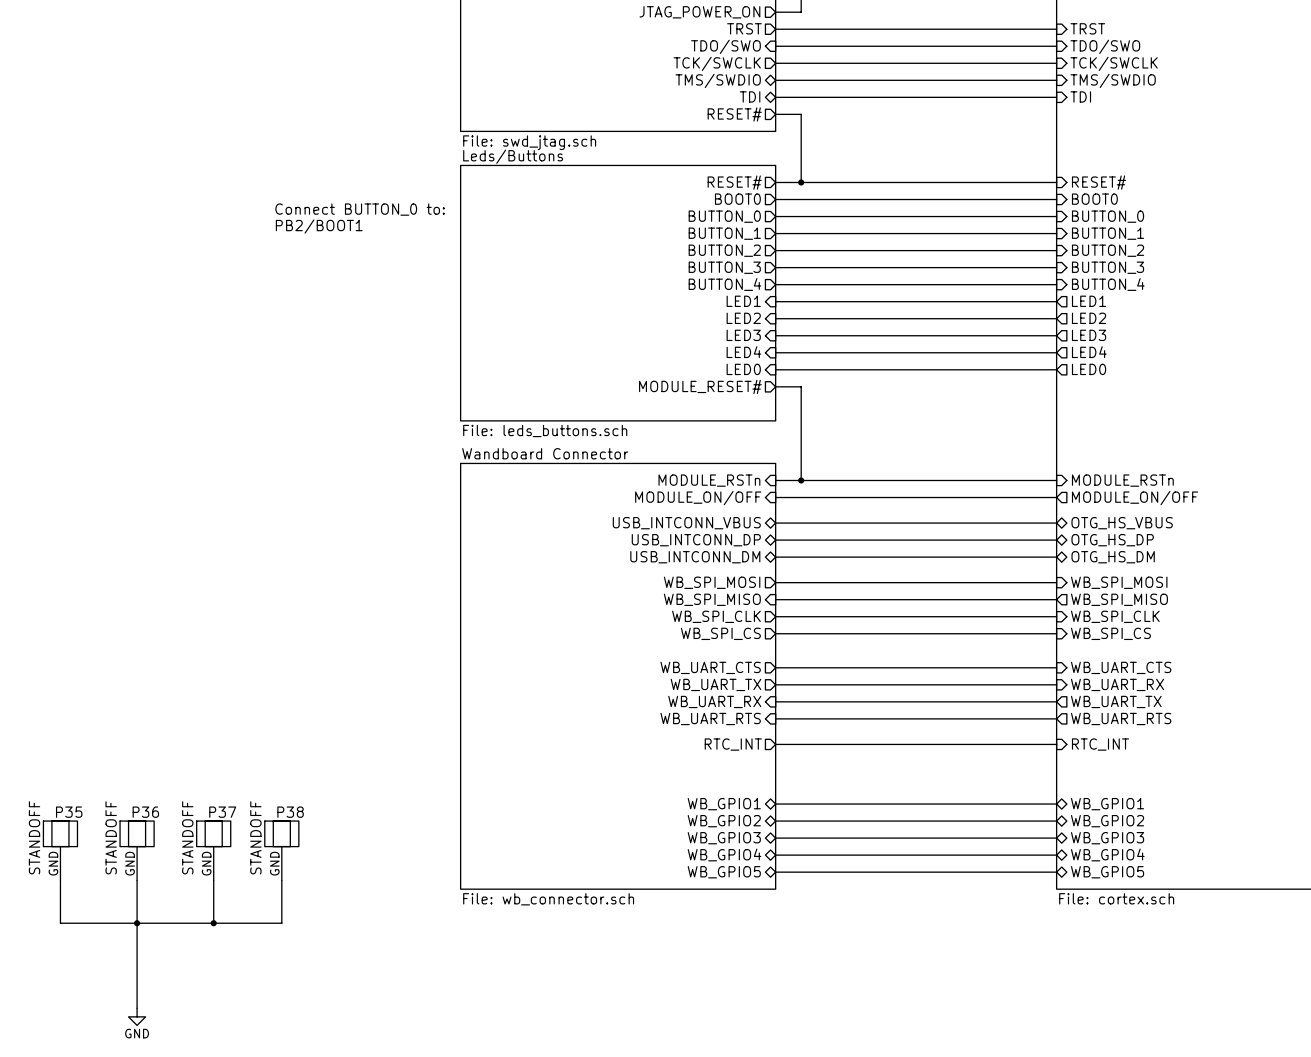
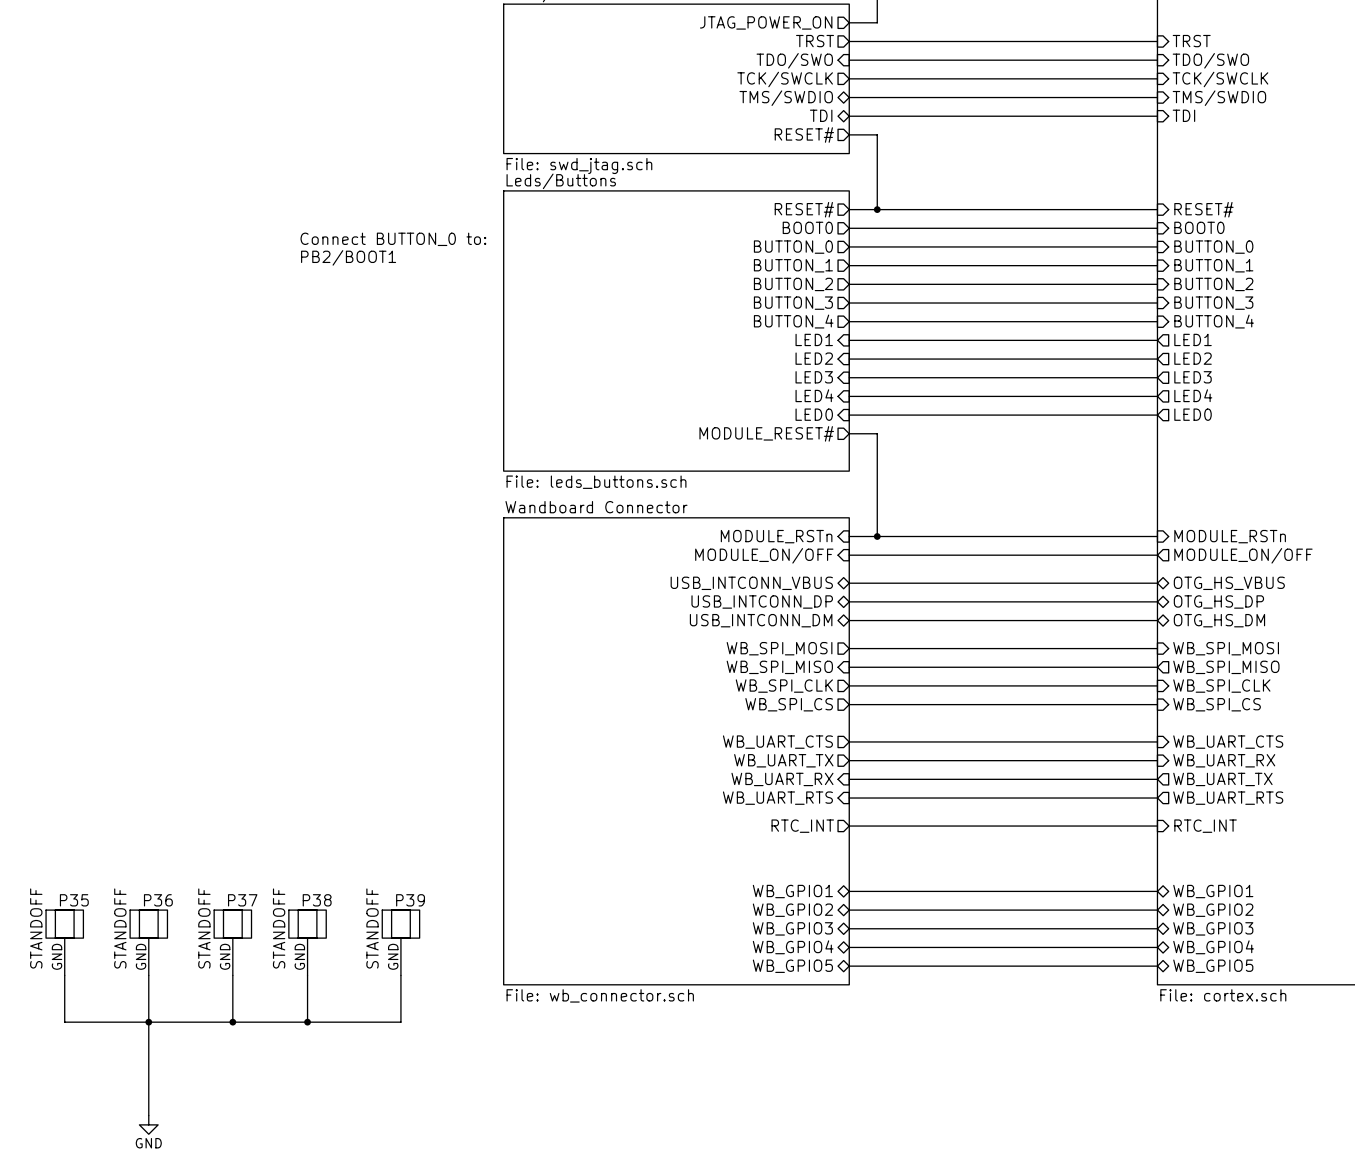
P39: none -> STANDOFF (400, 942)
wire: none -> (400, 975) (400, 1022) (307, 1022)
junction: none -> (307, 1022)

